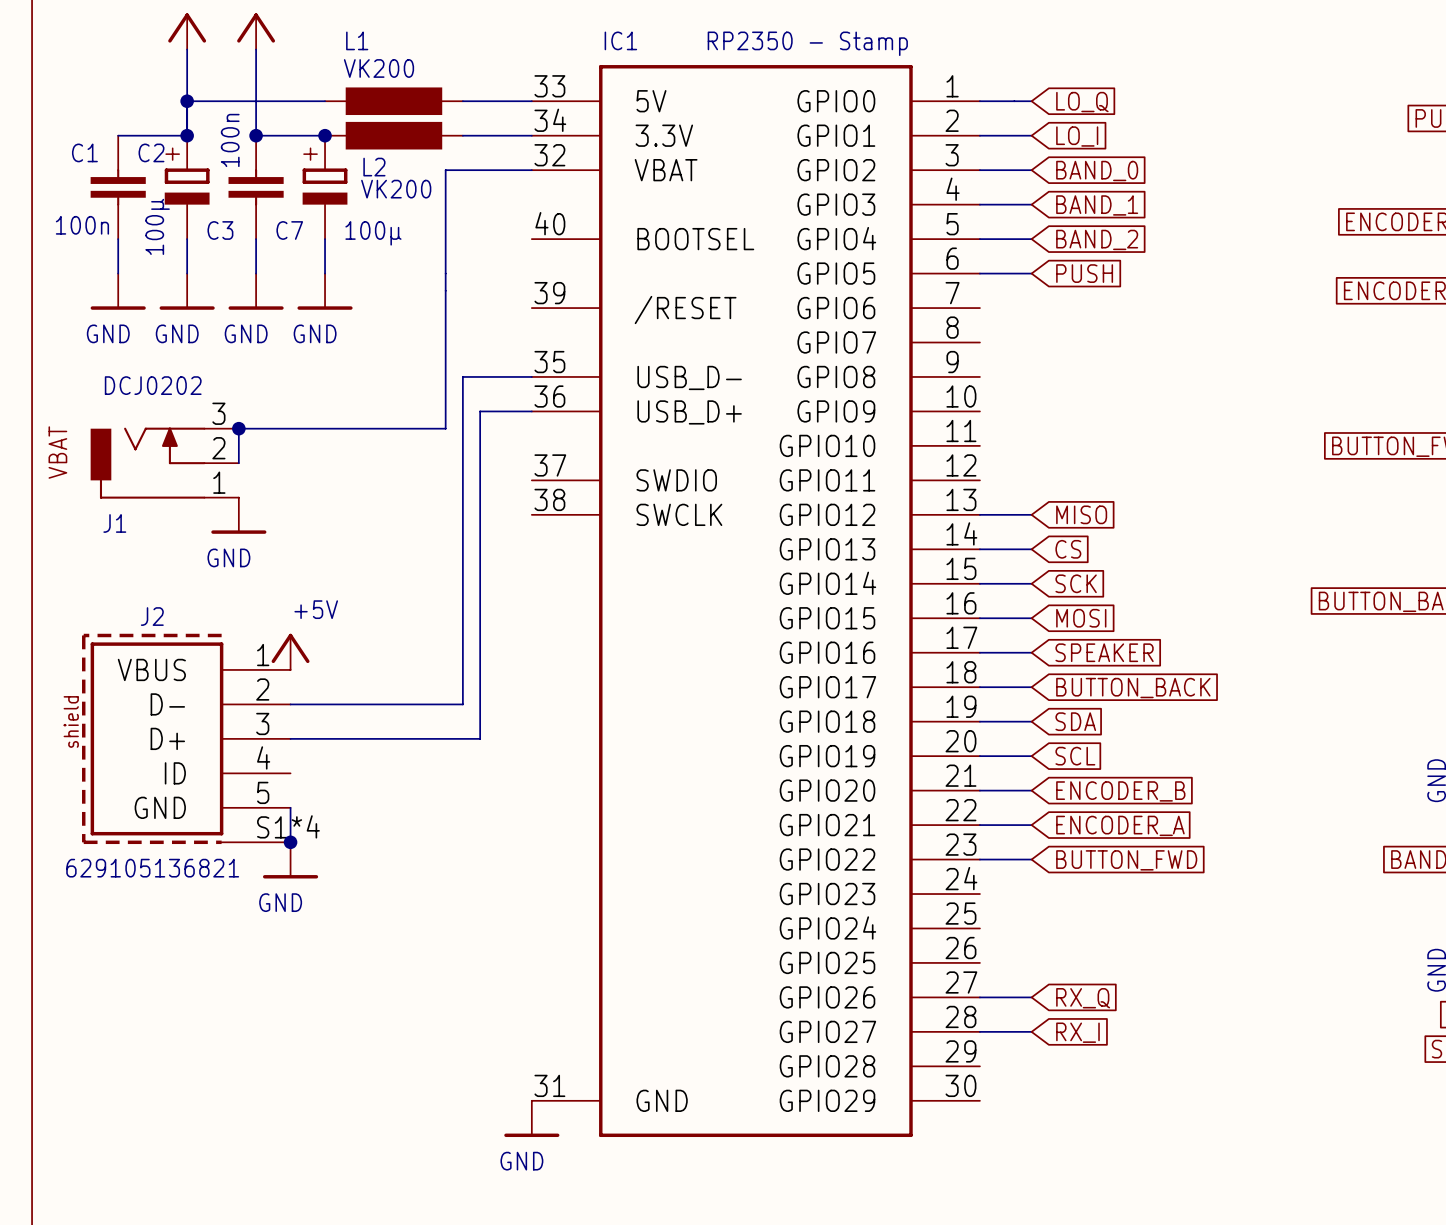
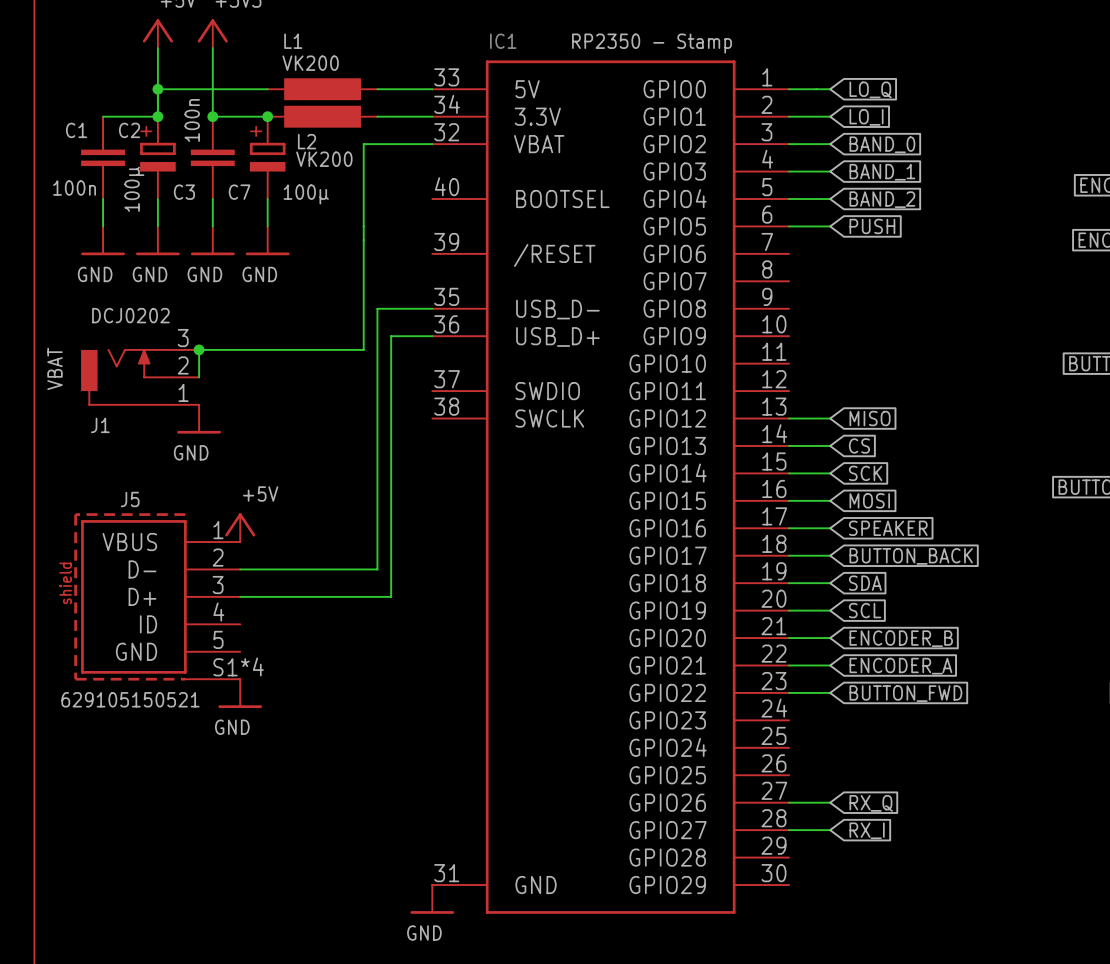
J2 name: J2 (152, 616) -> J5 (130, 499)
wire: (290, 807) (290, 842) -> none
junction: (290, 842) -> none
J2 value: 629105136821 (152, 868) -> 629105150521 (130, 699)

